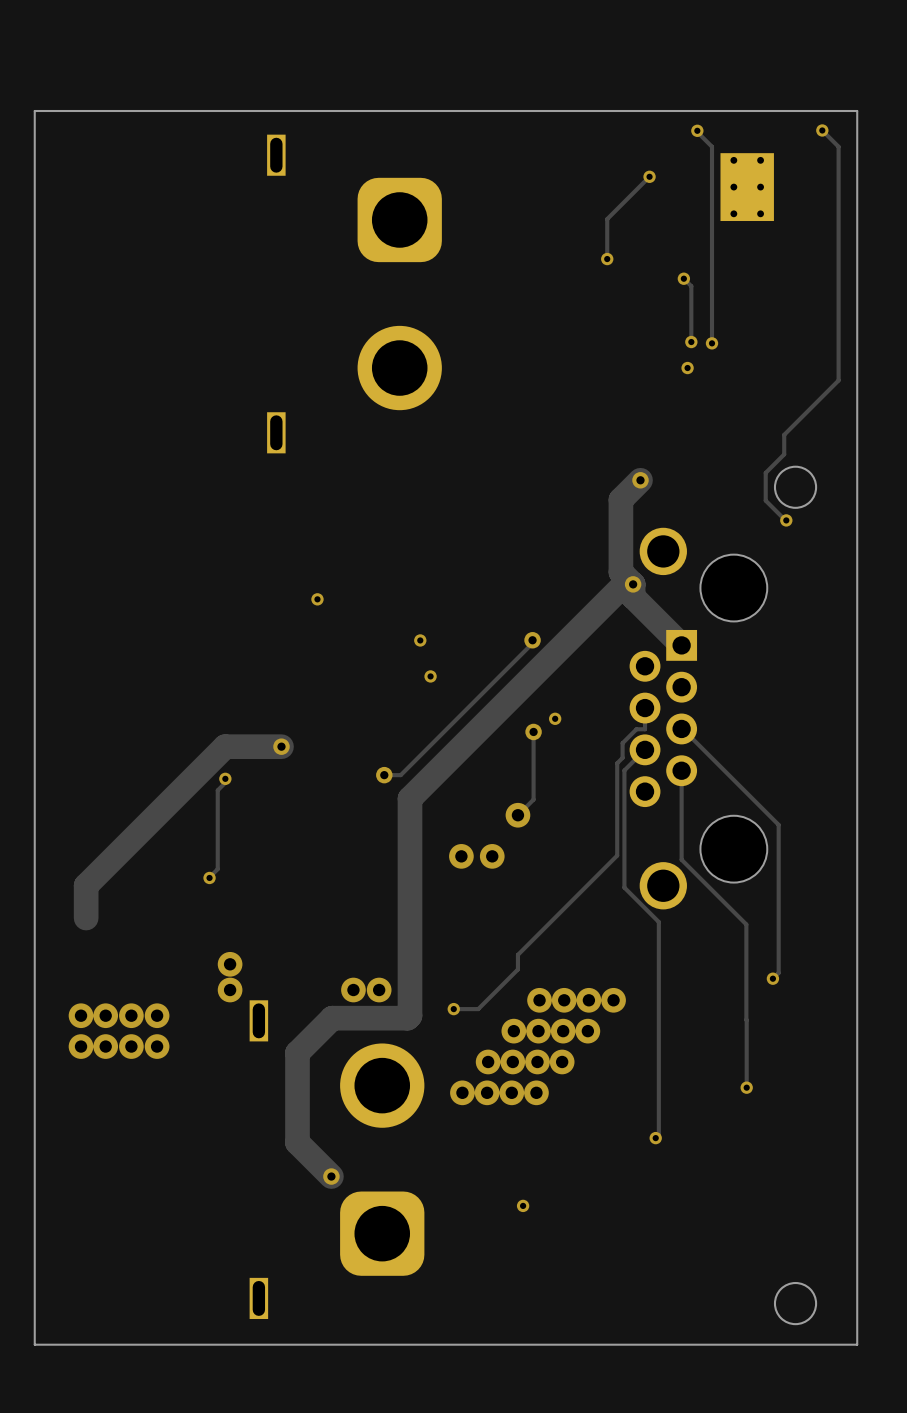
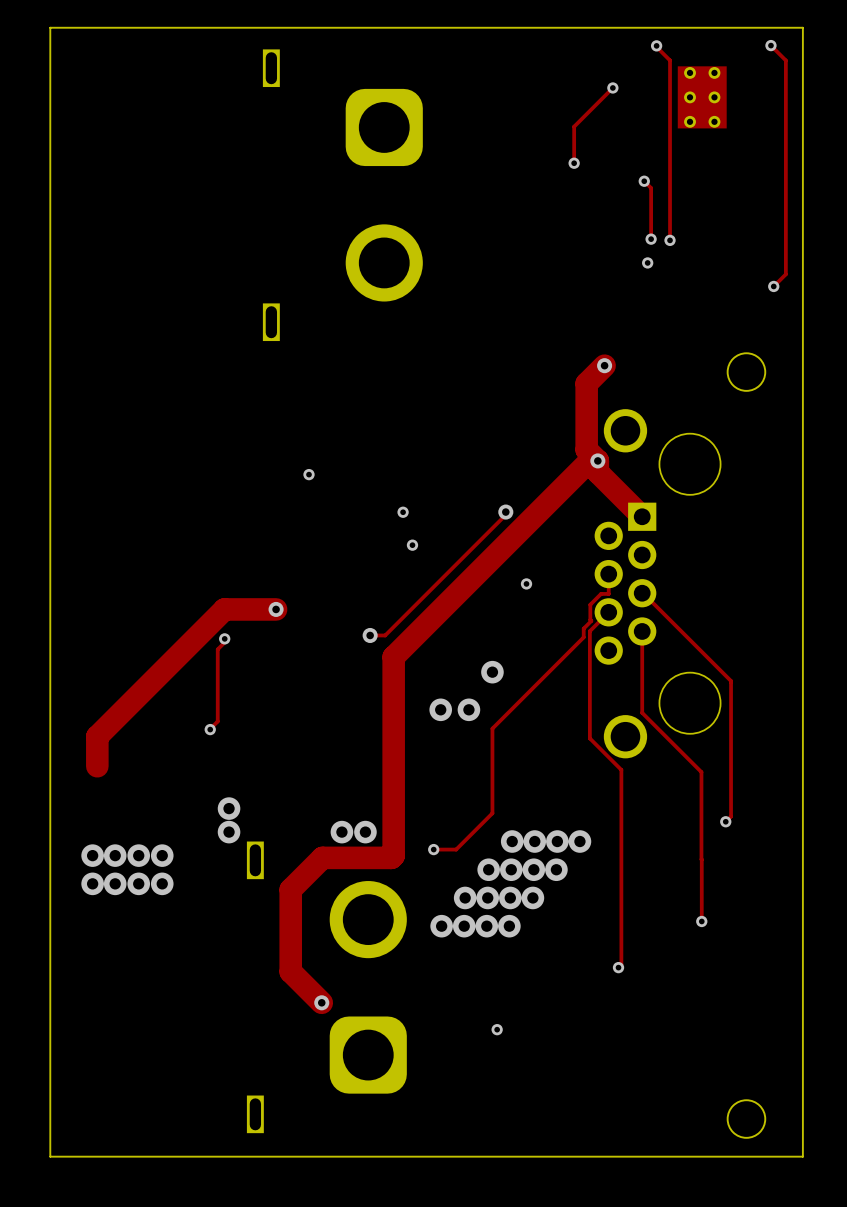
track: (825, 393) (784, 434) (784, 454) (765, 472) (765, 500) (786, 520) -> none
via: none -> (773, 286)
via: (786, 520) -> none
track: (645, 729) (636, 729) (622, 743) (622, 757) (617, 763) (617, 855) (517, 954) -> (608, 593) (601, 593) (590, 604) (591, 620) (583, 628) (583, 637) (492, 728) (492, 799)
track: (533, 731) (533, 799) (517, 815) -> none
via: (533, 731) -> none

